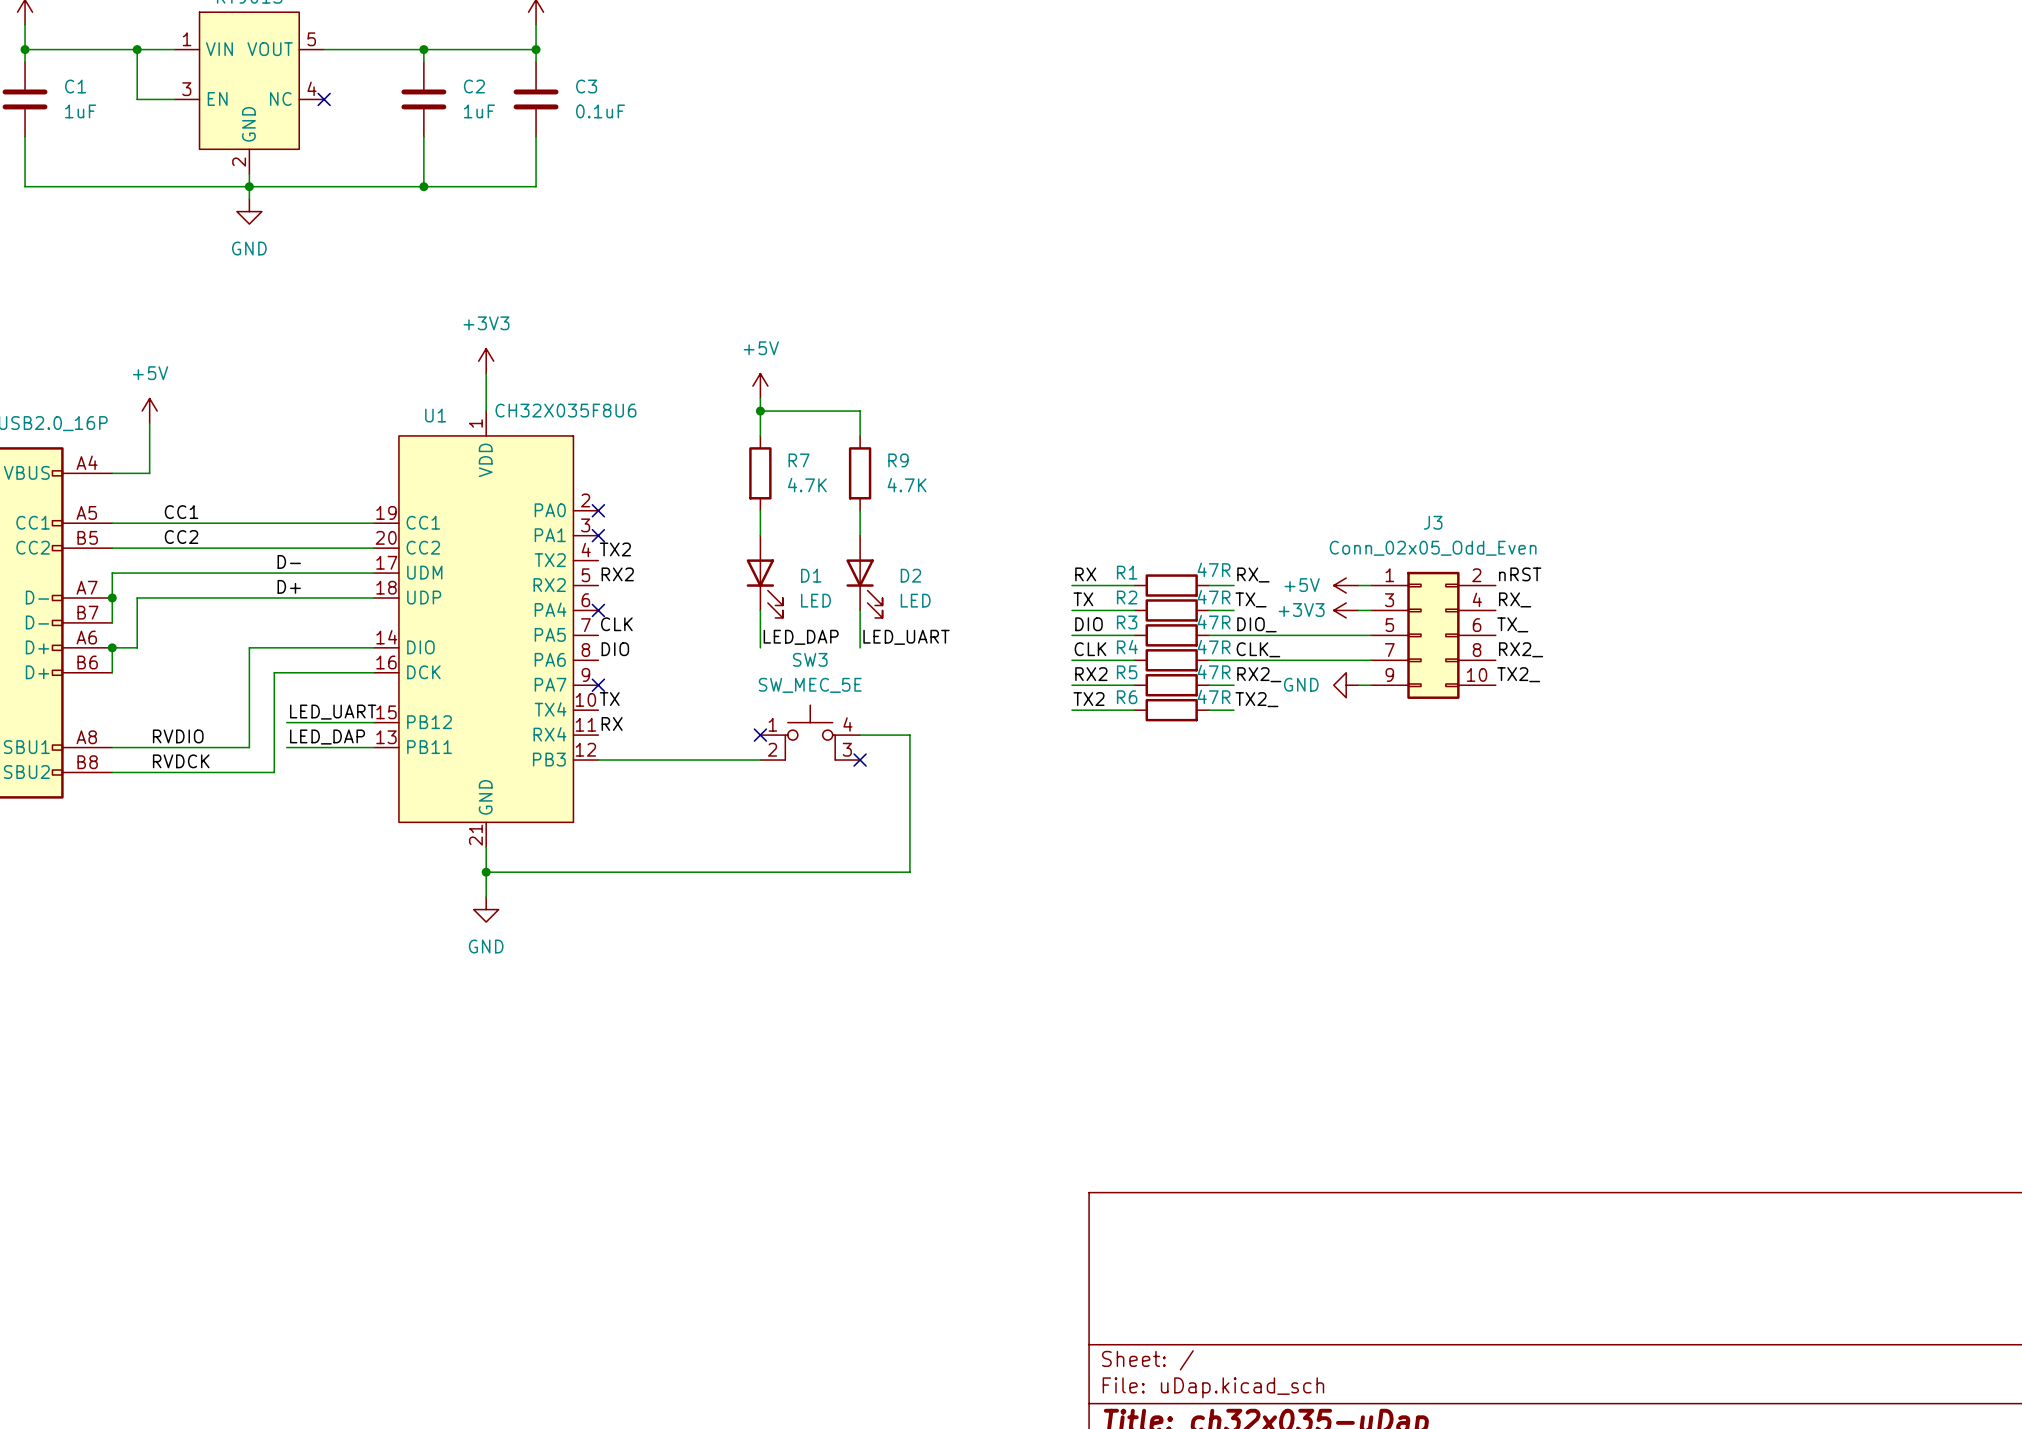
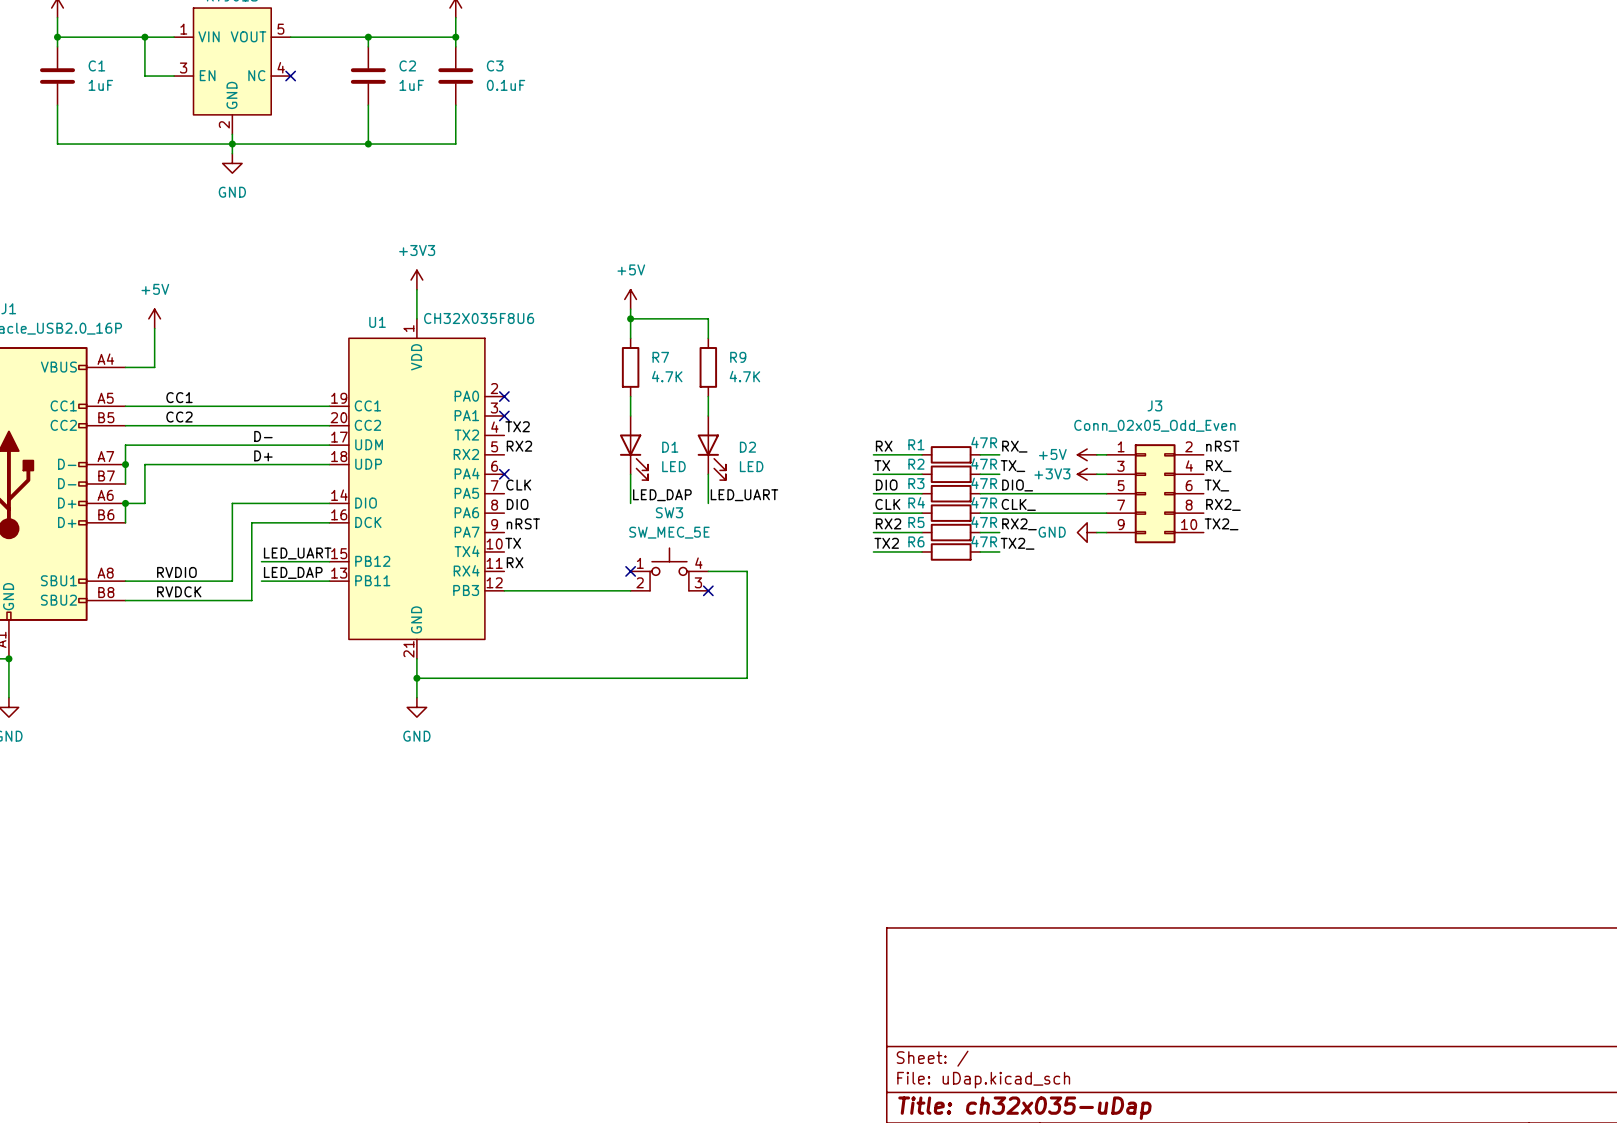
label: none -> nRST (523, 523)
no-connect mark: (598, 685) -> none

